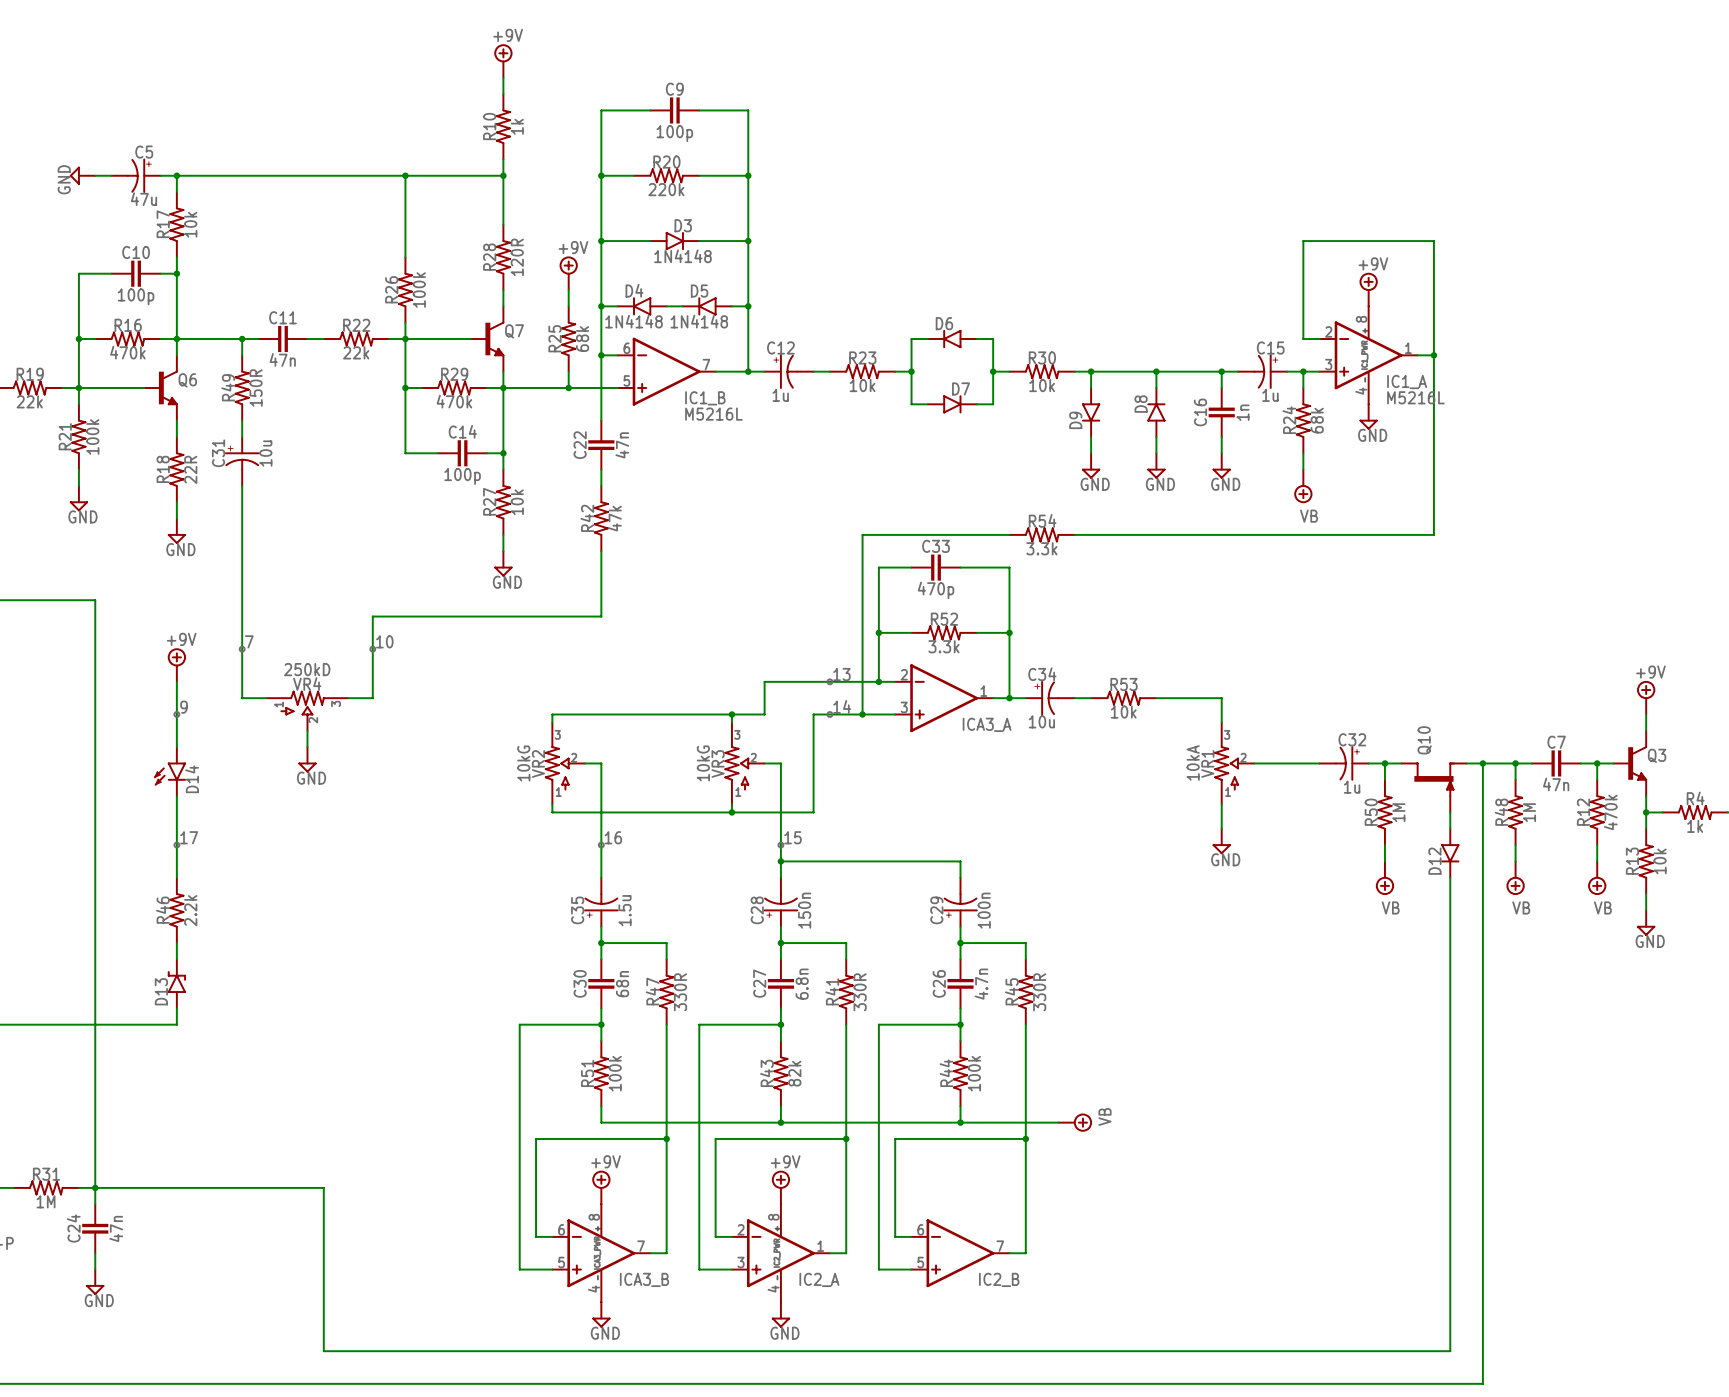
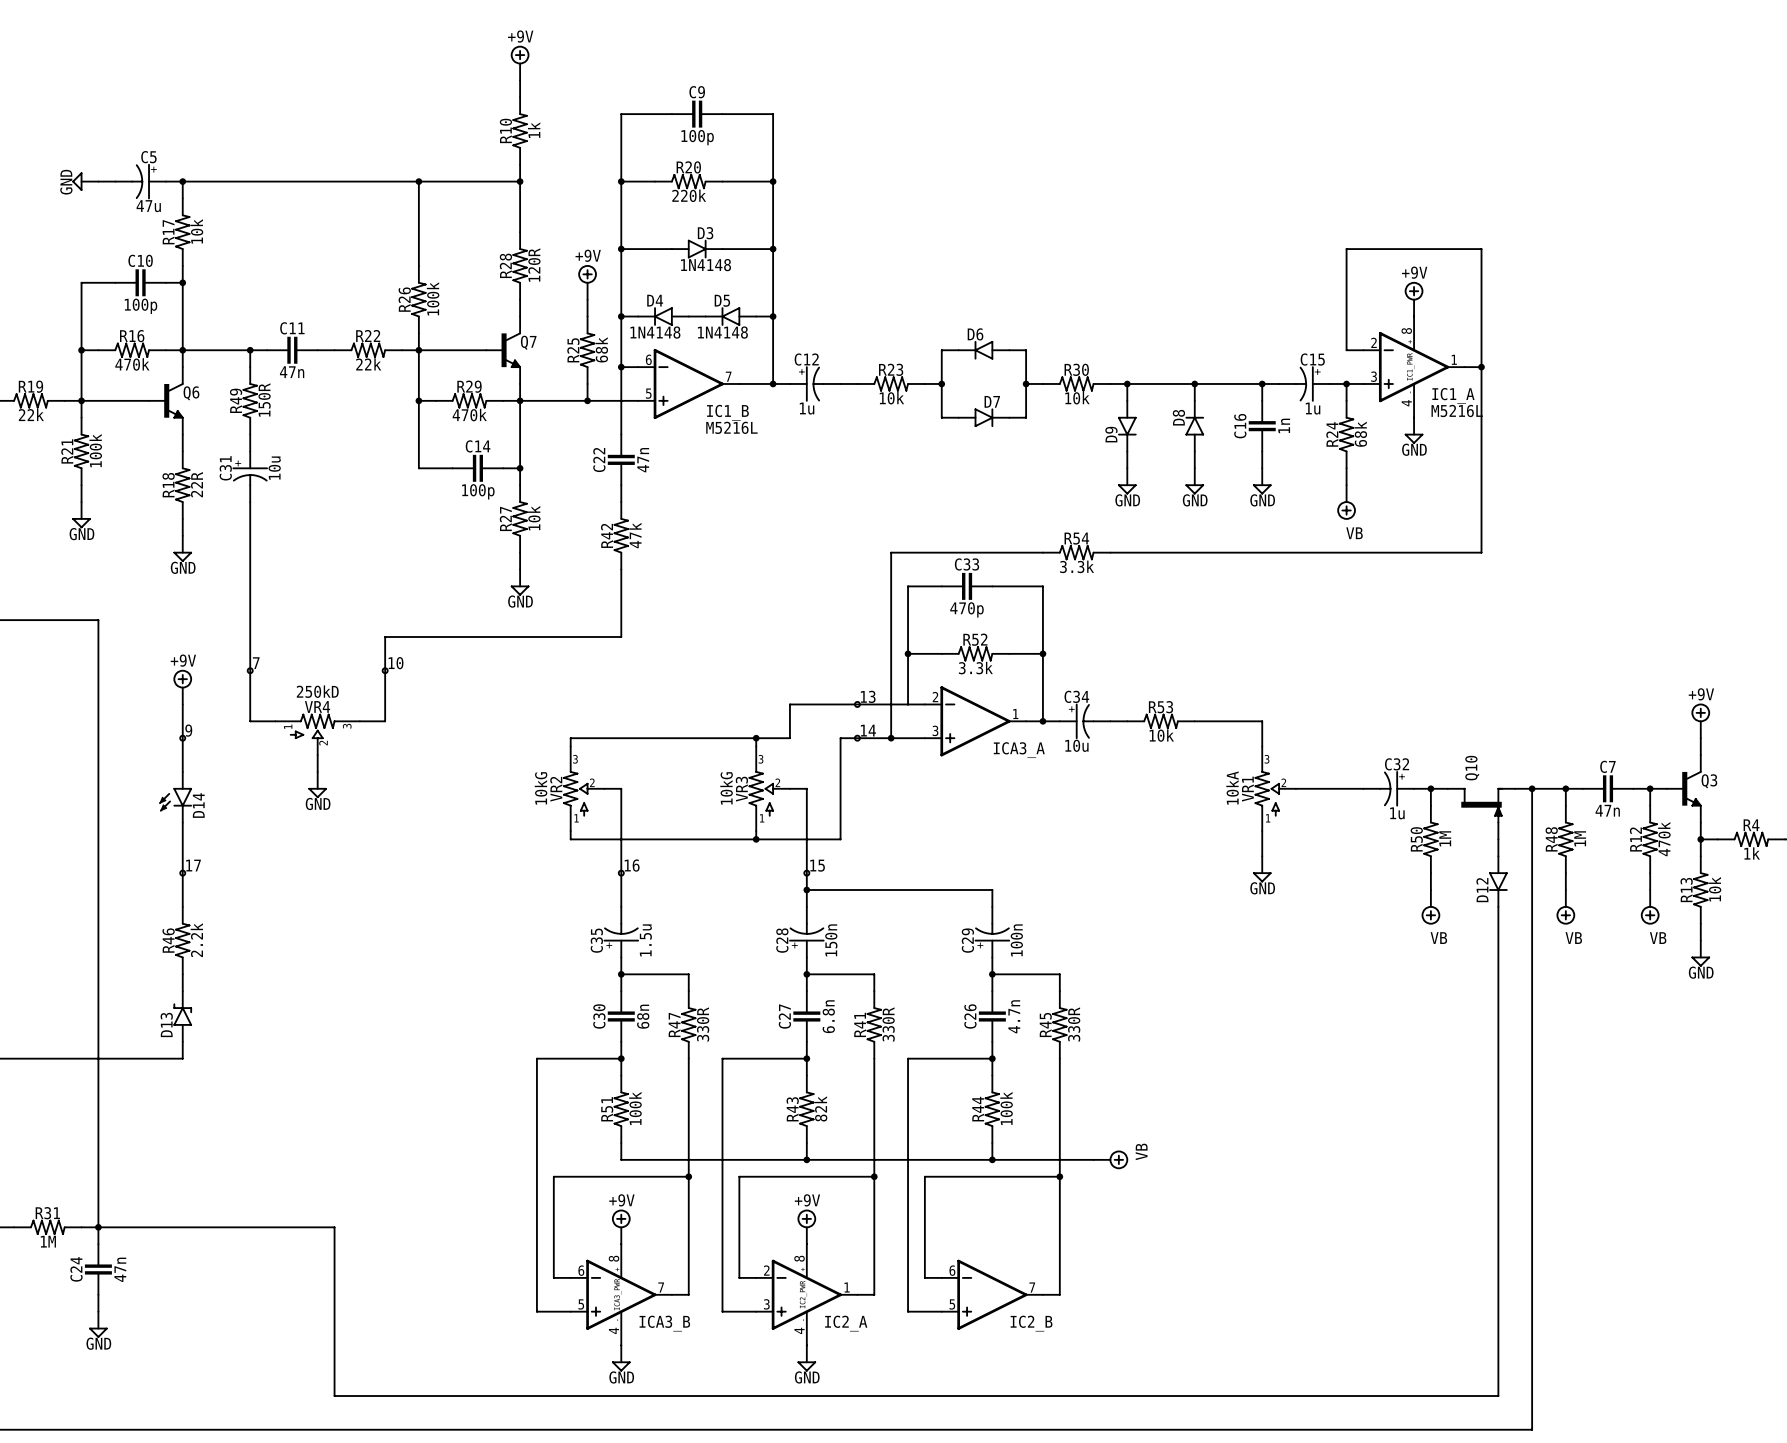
junction: (878, 681) -> none

